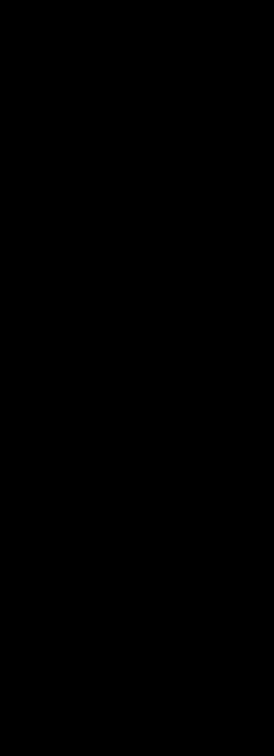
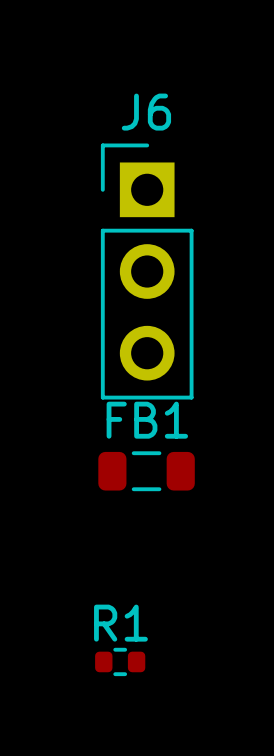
J6: none -> (147, 271)
FB1: none -> (146, 471)
R1: none -> (120, 661)

